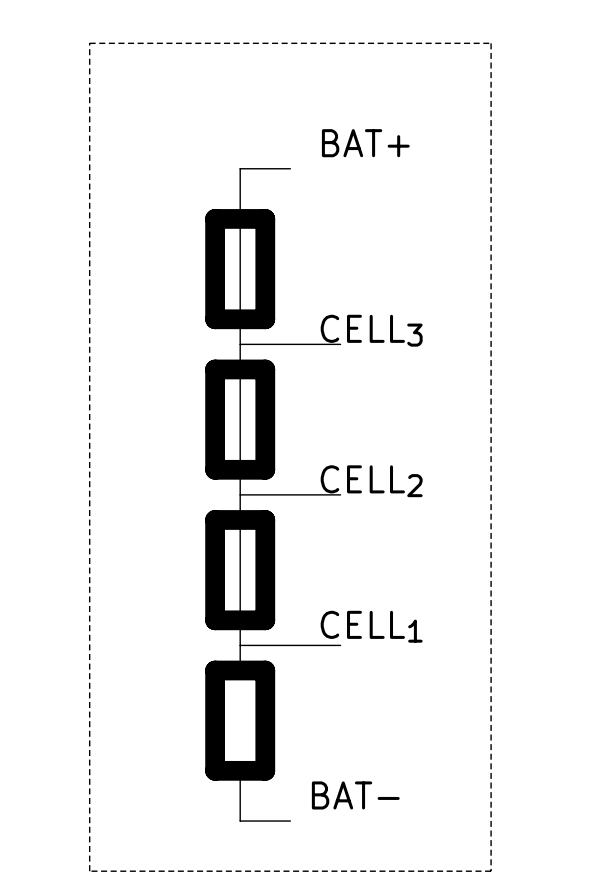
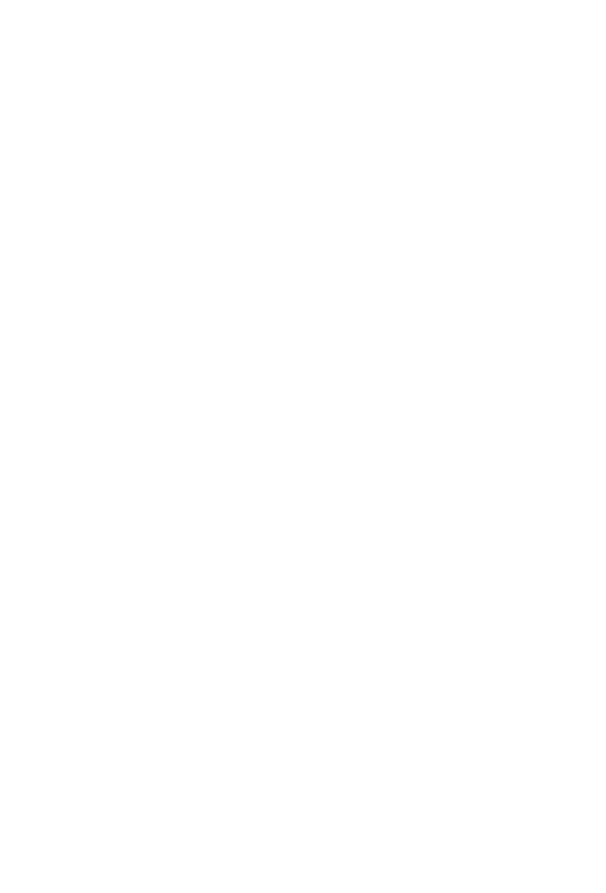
line: (89, 43) (491, 43) (491, 871) (89, 871) (89, 43) -> none
text: BAT+ (365, 143) -> none
line: (290, 168) (240, 168) (240, 670) -> none
line: (215, 218) (265, 218) (265, 319) (215, 319) (215, 218) -> none
text: CELL3 (371, 330) -> none
line: (240, 344) (340, 344) -> none
line: (215, 369) (215, 469) (265, 469) (265, 369) (215, 369) -> none
text: CELL2 (371, 481) -> none
line: (240, 494) (340, 494) -> none
line: (215, 519) (215, 620) (265, 620) (265, 519) (215, 519) -> none
text: CELL1 (371, 626) -> none
line: (240, 645) (340, 645) -> none
line: (215, 670) (215, 770) (265, 770) (265, 670) (215, 670) -> none
line: (240, 770) (240, 821) (290, 821) -> none
text: BAT- (355, 795) -> none

